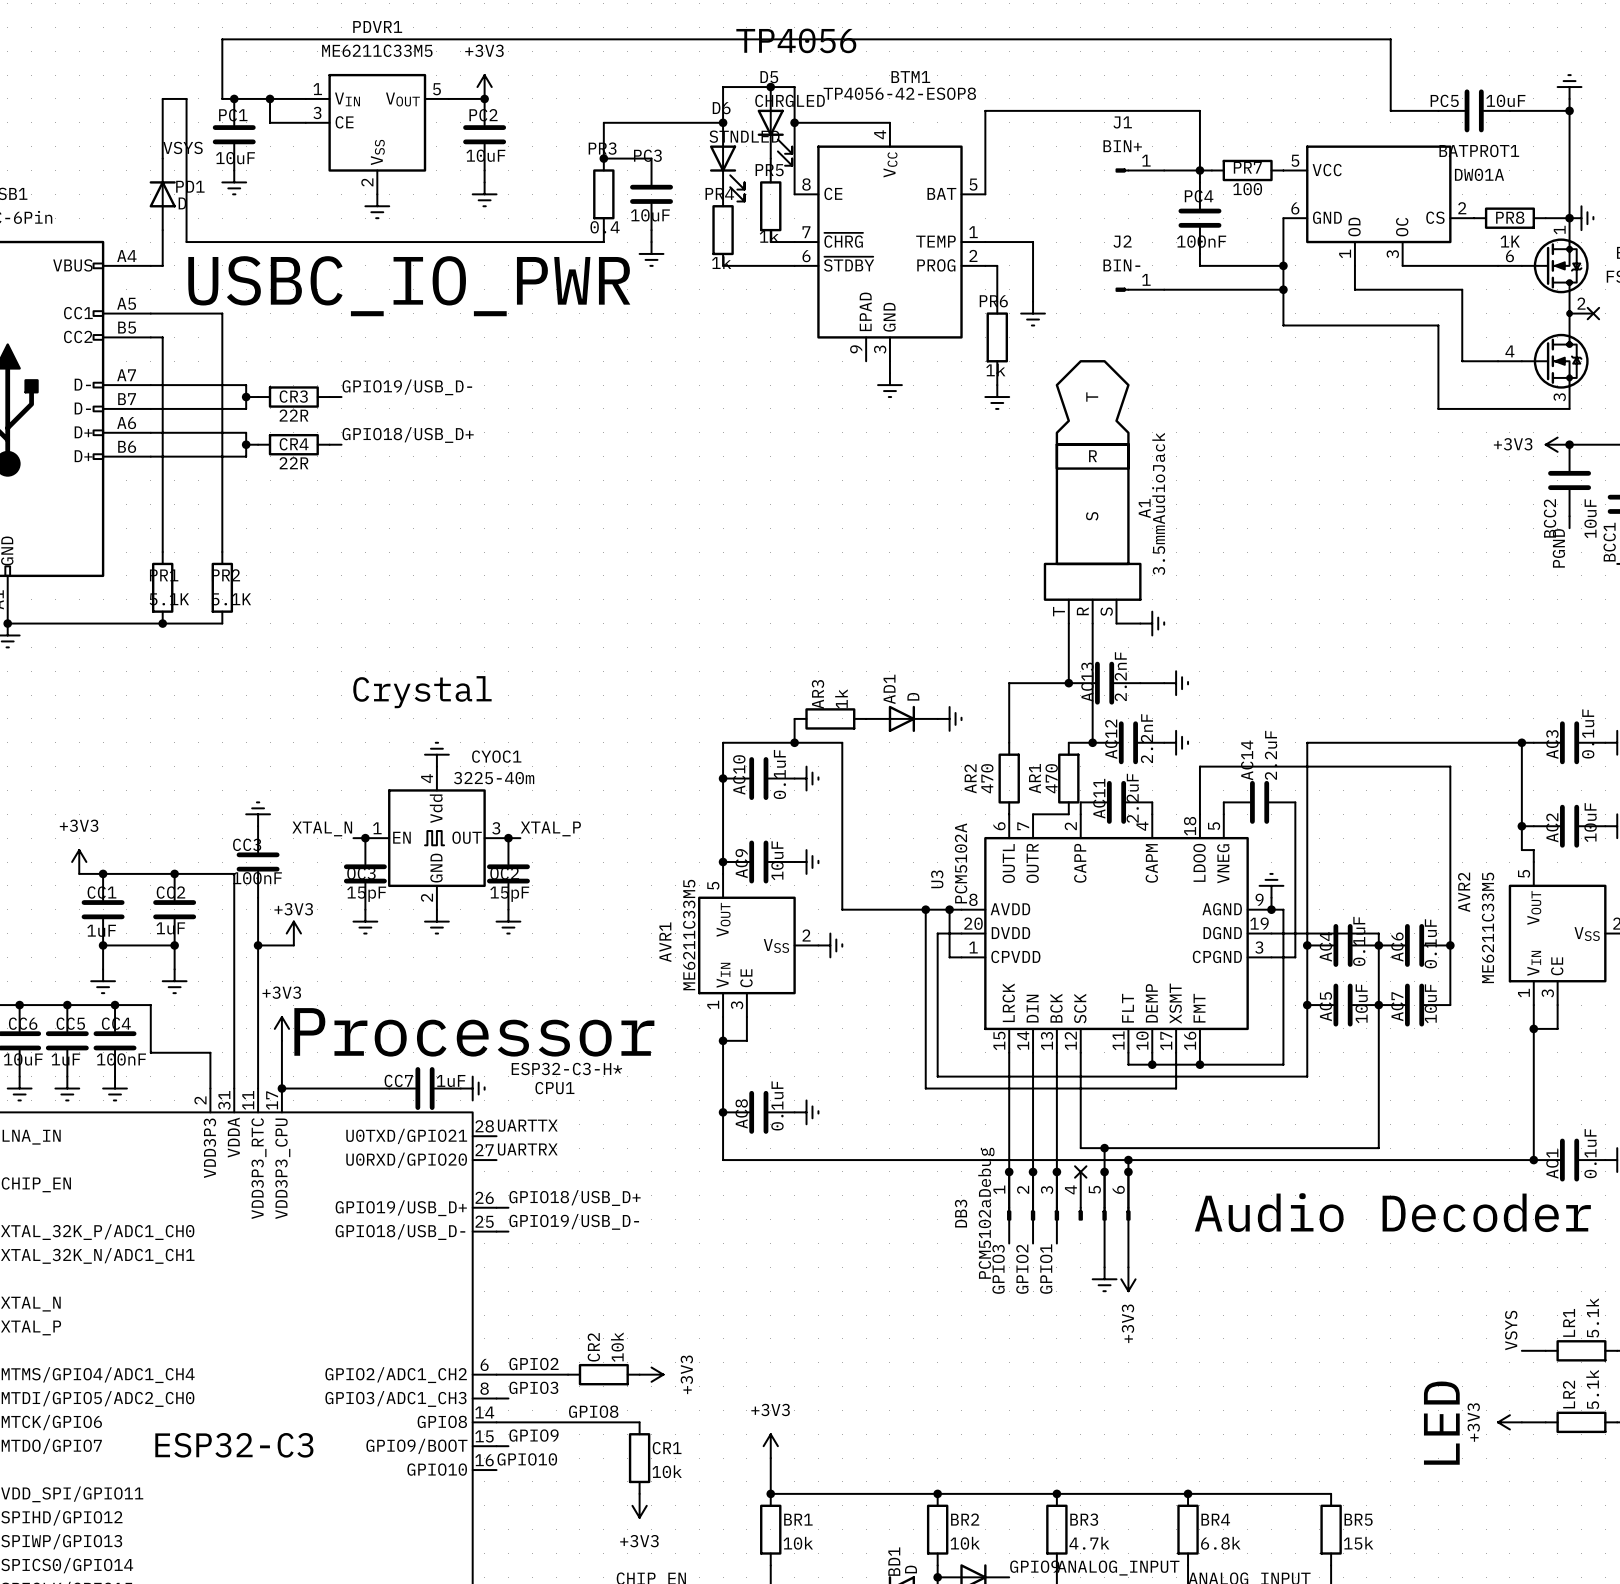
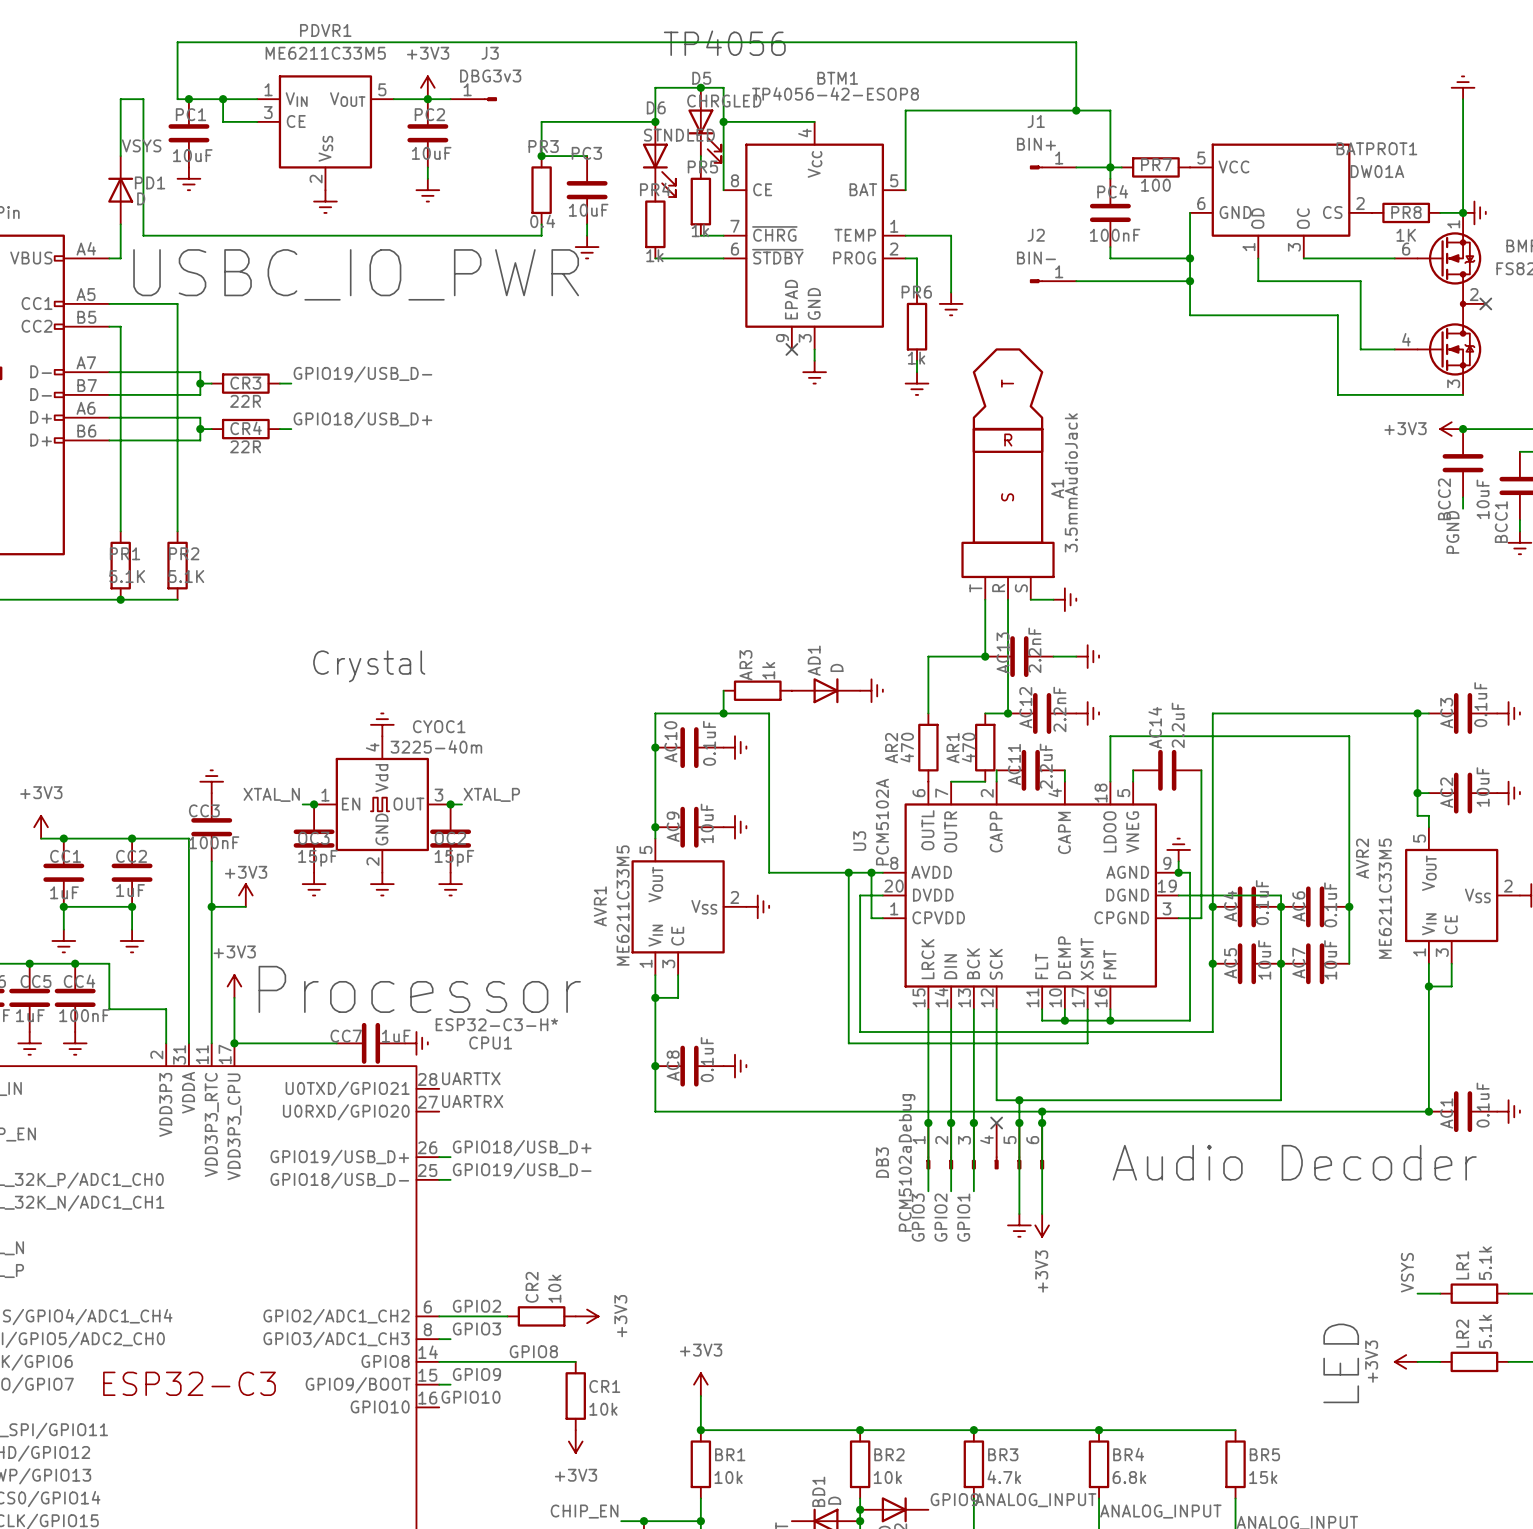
wire: (1164, 39) (1390, 39) (1390, 110) (1438, 110) -> (1076, 42) (1076, 110)
wire: none -> (427, 99) (450, 99)
J3: none -> DBG3v3 (473, 99)
junction: none -> (1076, 110)
PC5: 10uF (1474, 110) -> none
wire: (1509, 110) (1569, 110) -> none
junction: (1569, 110) -> none
no-connect mark: none -> (791, 349)

